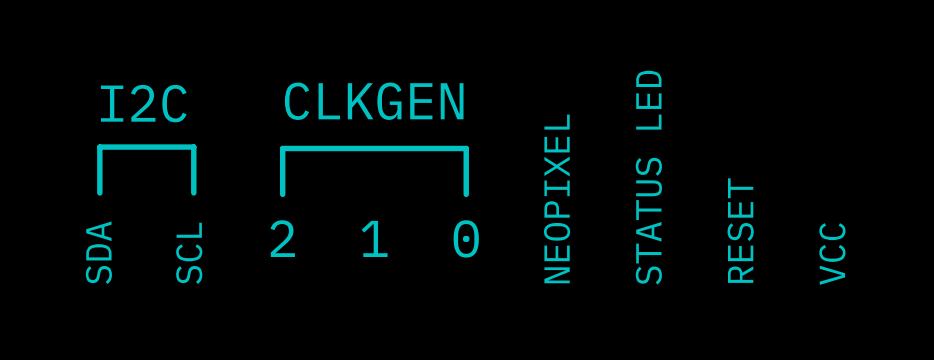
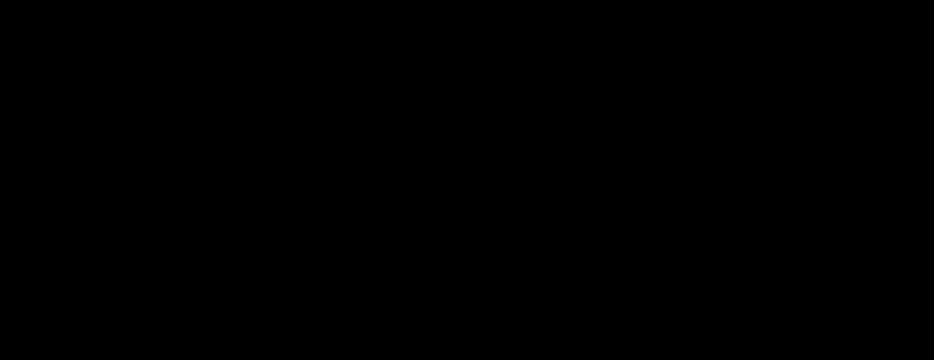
text: CLKGEN (374, 101) -> none
text: I2C (143, 103) -> none
text: STATUS LED (648, 177) -> none
line: (99, 192) (99, 147) (193, 147) (193, 192) -> none
line: (282, 194) (282, 148) (466, 148) (466, 194) -> none
text: NEOPIXEL (557, 198) -> none
text: RESET (740, 230) -> none
text: 2 (282, 238) -> none
text: 1 (374, 238) -> none
text: 0 (466, 238) -> none
text: SDA (98, 252) -> none
text: SCL (189, 253) -> none
text: VCC (832, 254) -> none

